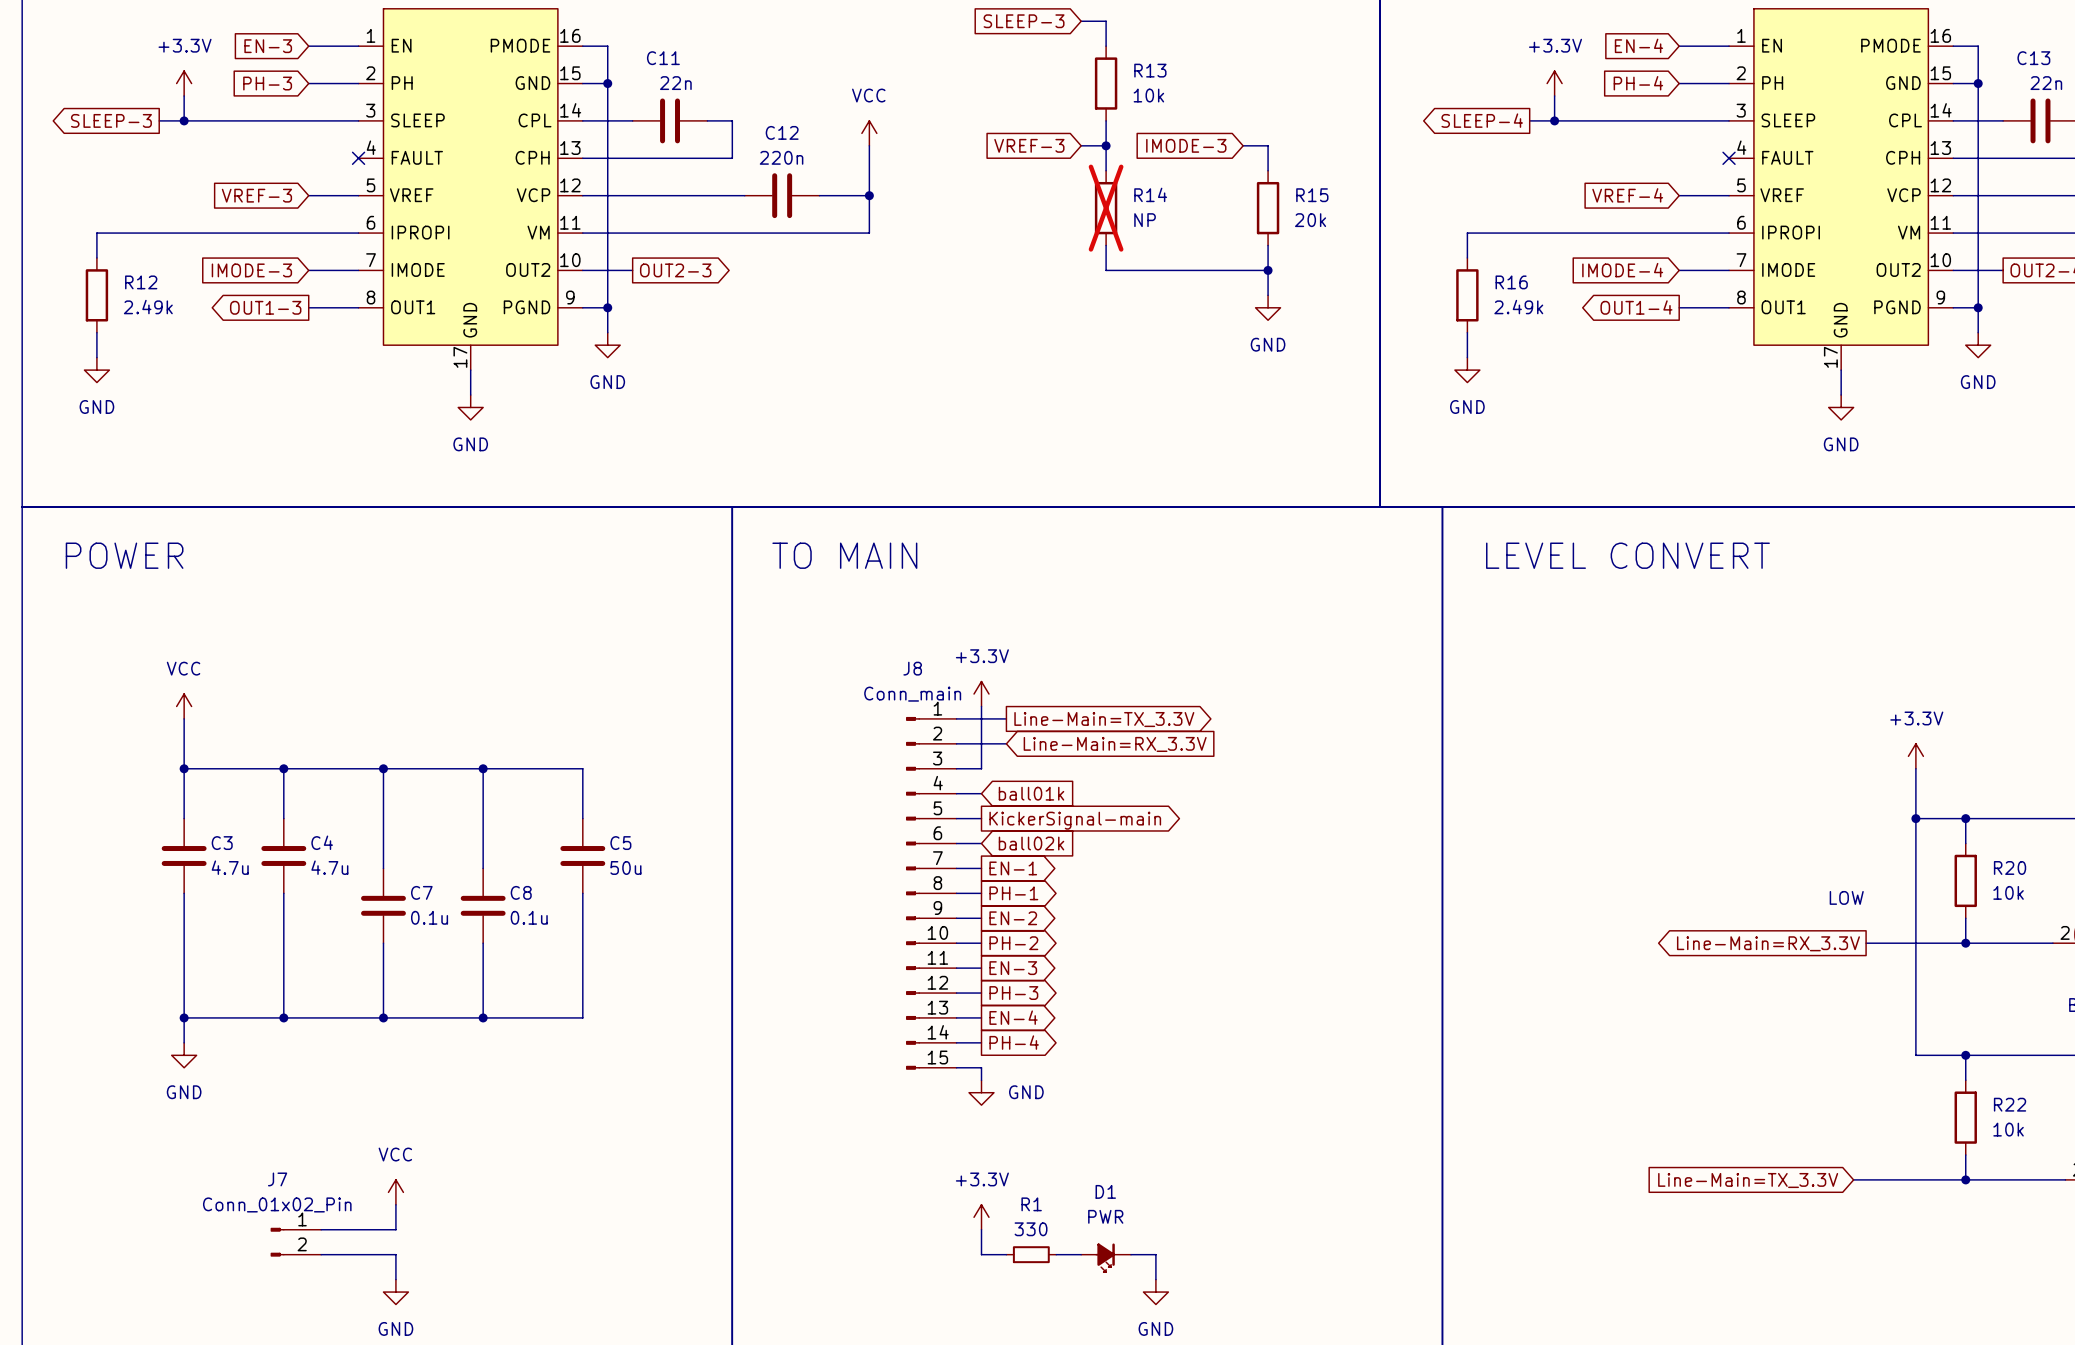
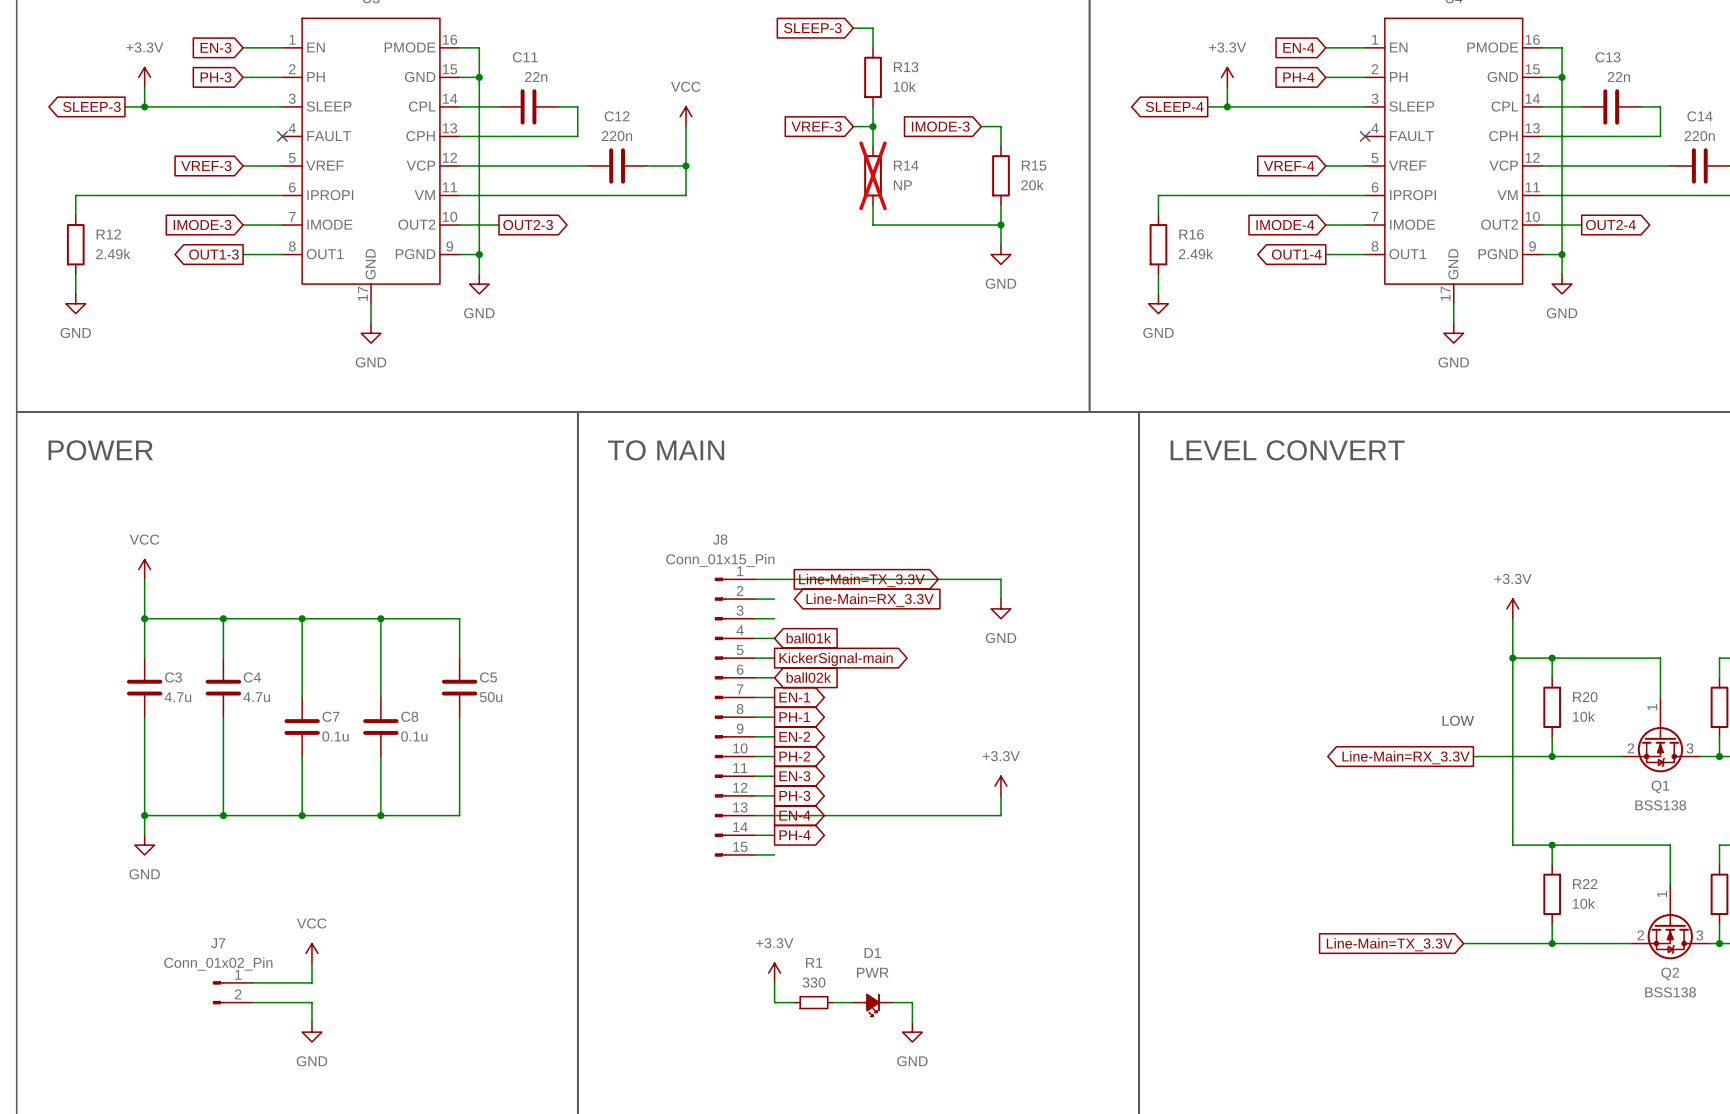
J8 value: Conn_main (912, 694) -> Conn_01x15_Pin (720, 560)
power symbol: +3.3V (981, 694) -> none
wire: (981, 706) (981, 768) -> none
wire: none -> (794, 579) (1000, 579) (1000, 599)
wire: (981, 743) (1006, 743) -> none
power symbol: none -> GND (1000, 608)
power symbol: none -> +3.3V (1000, 786)
wire: none -> (1000, 795) (1000, 815) (774, 815)
wire: (981, 1067) (981, 1080) -> none
power symbol: GND (981, 1092) -> none

